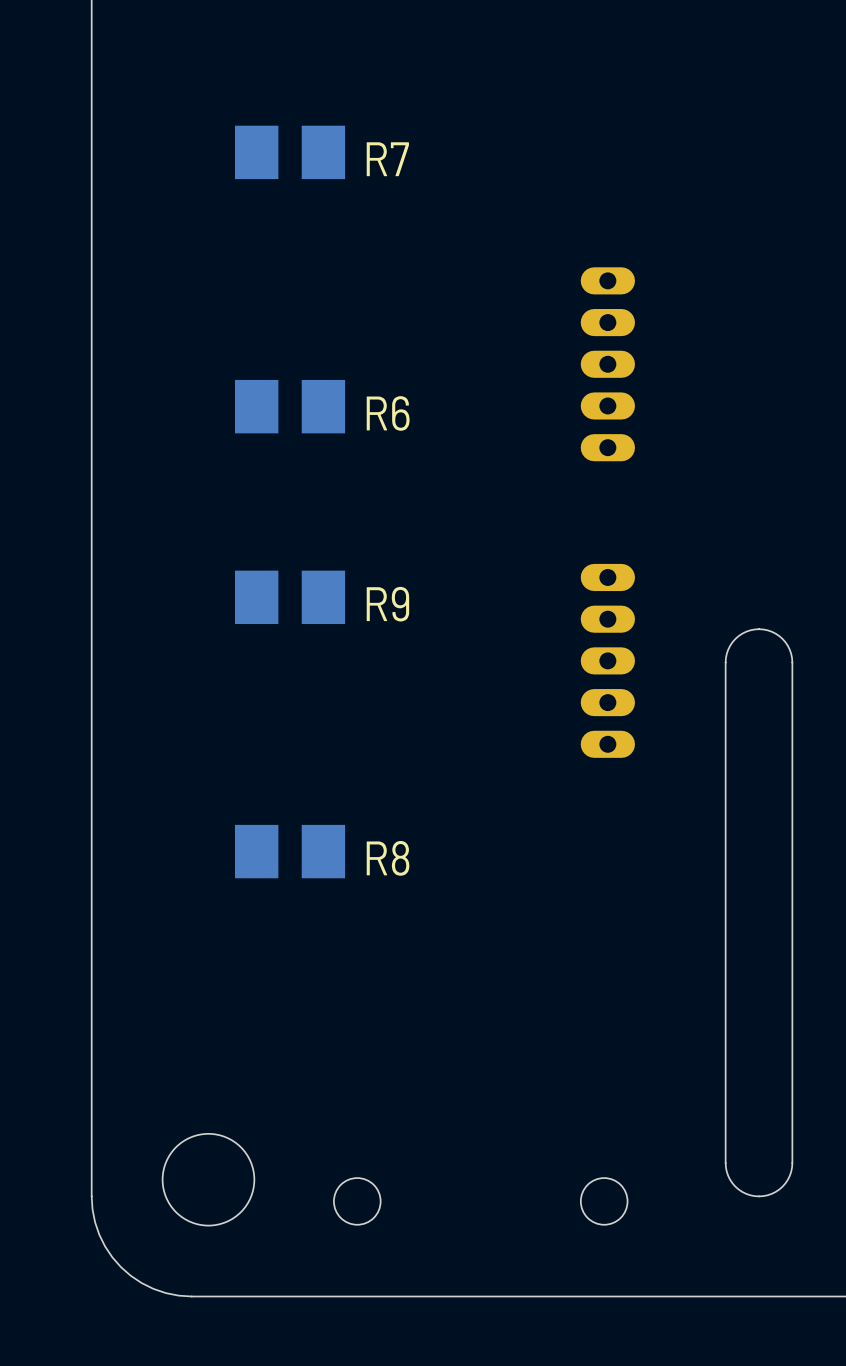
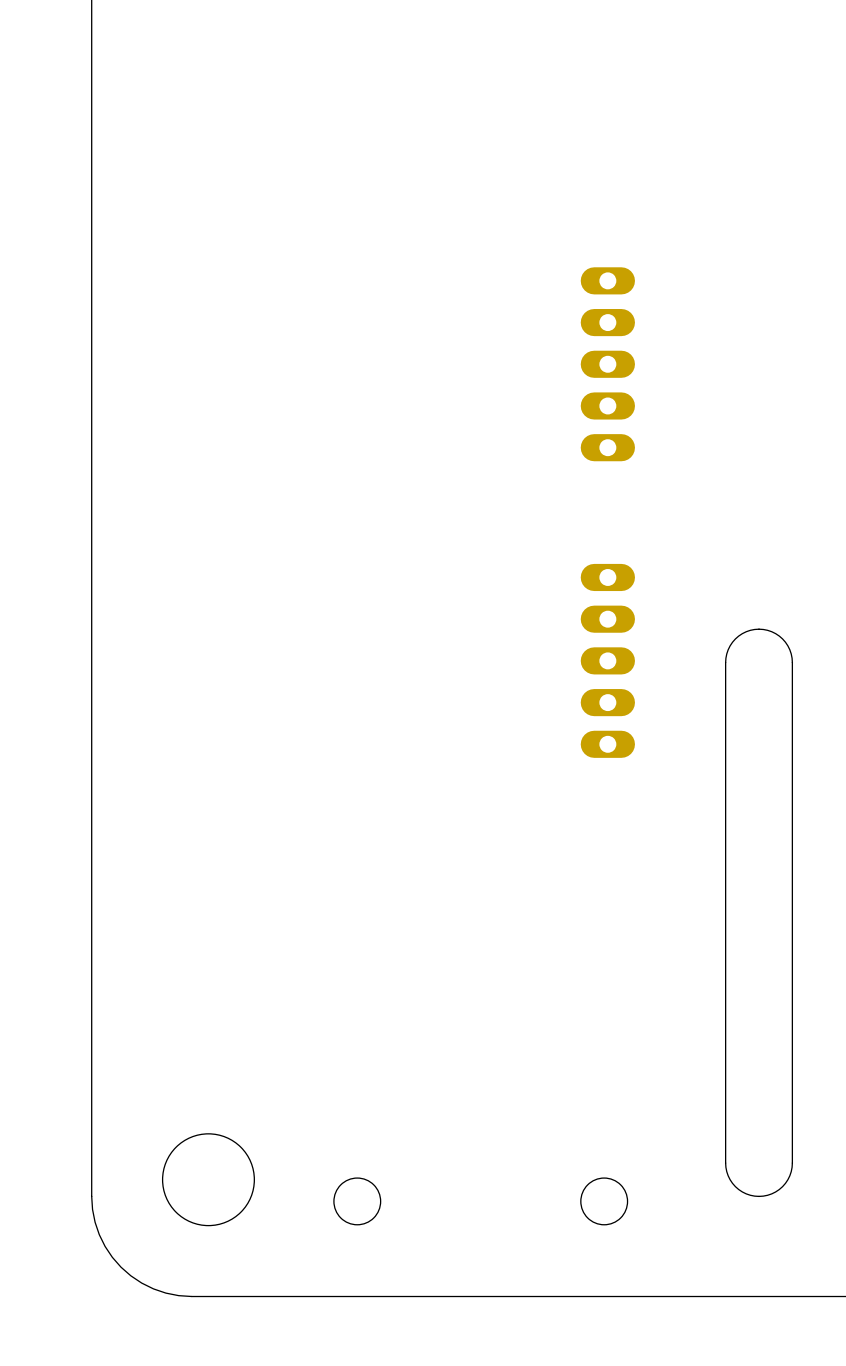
R7: (290, 152) -> none
R6: (290, 406) -> none
R9: (290, 597) -> none
R8: (290, 851) -> none

